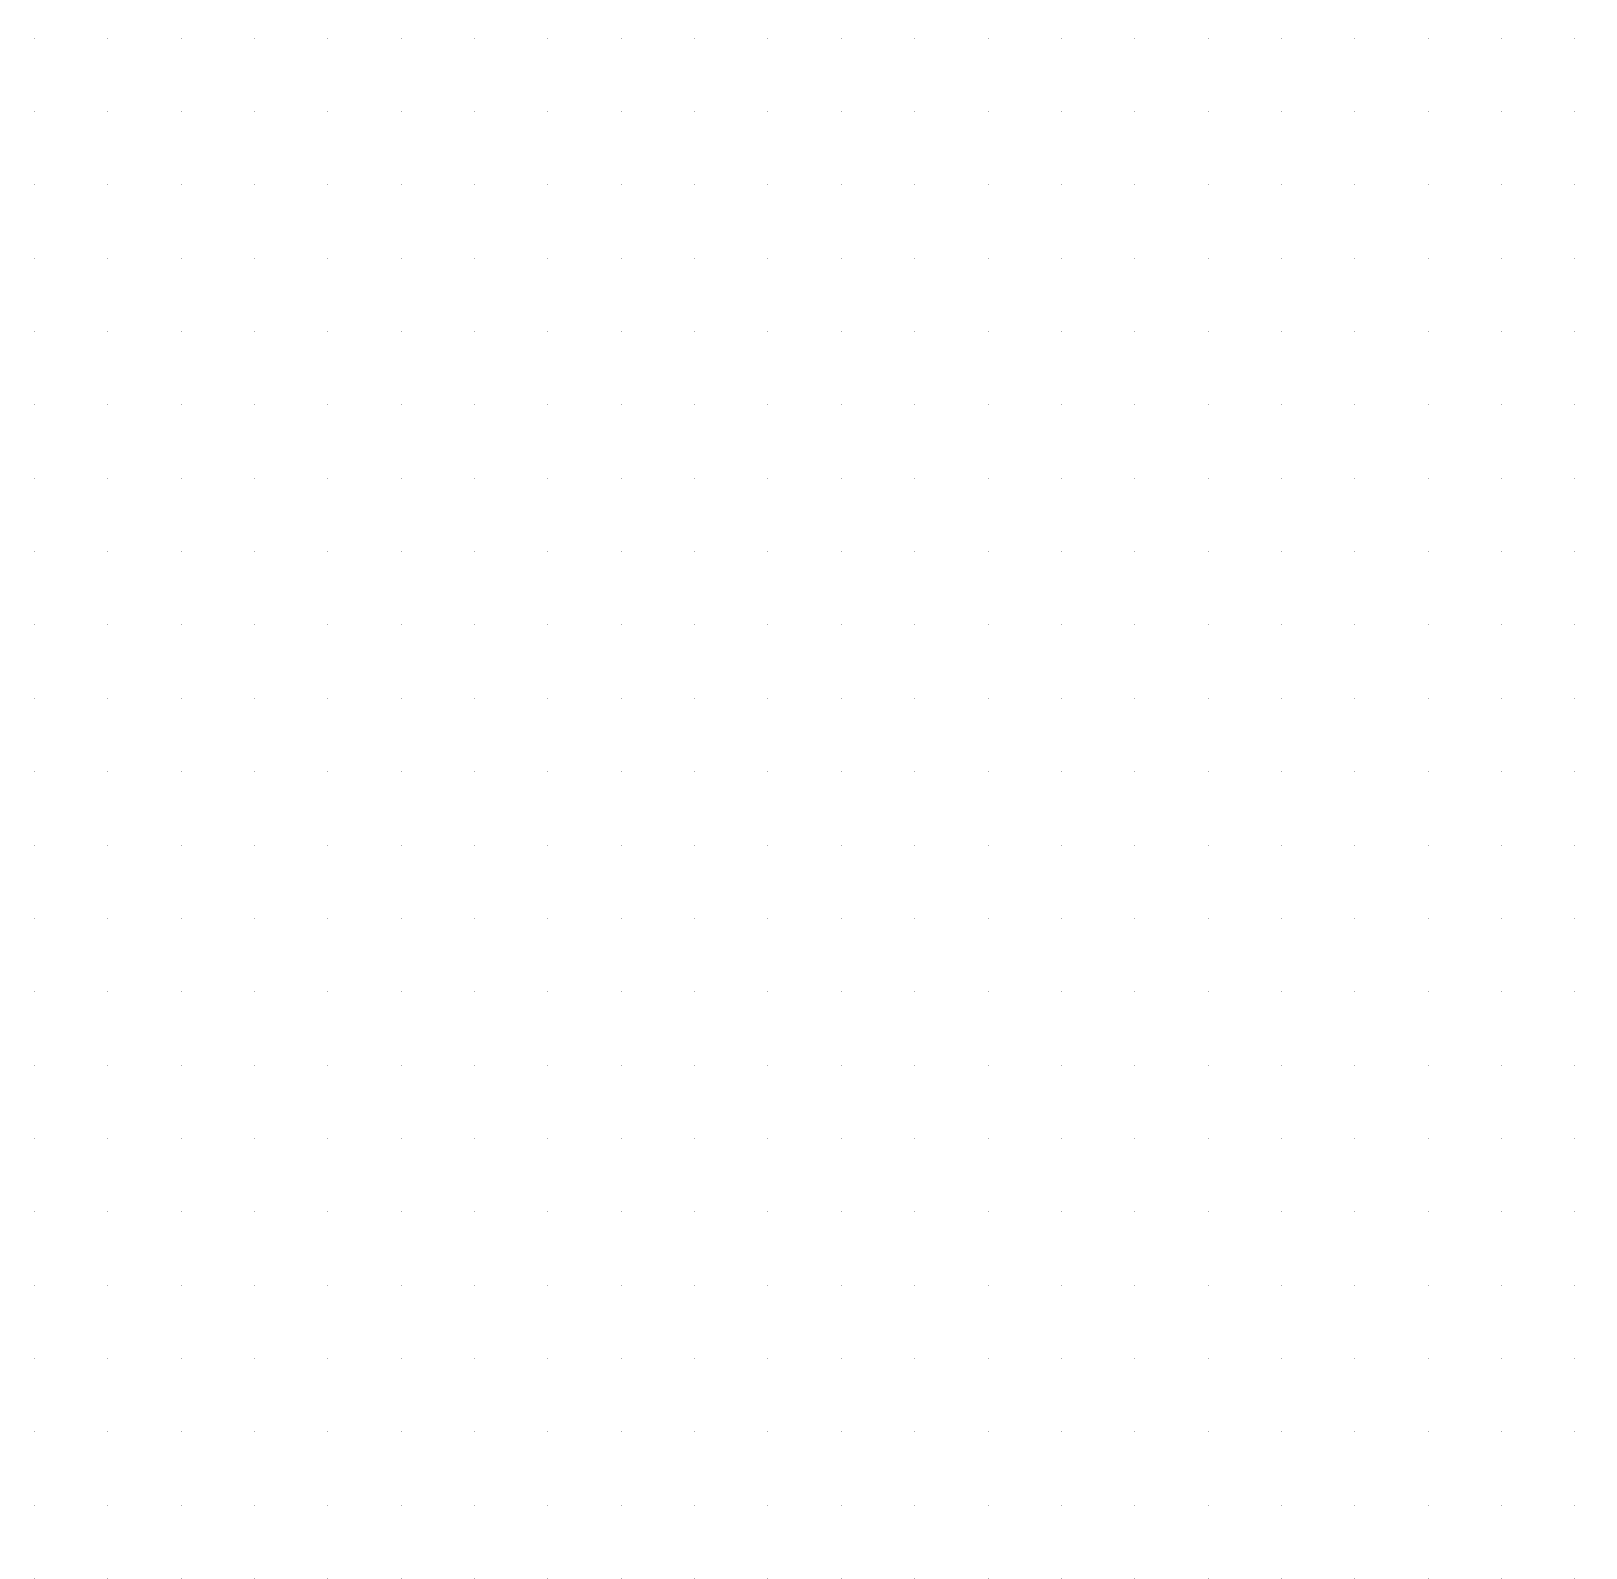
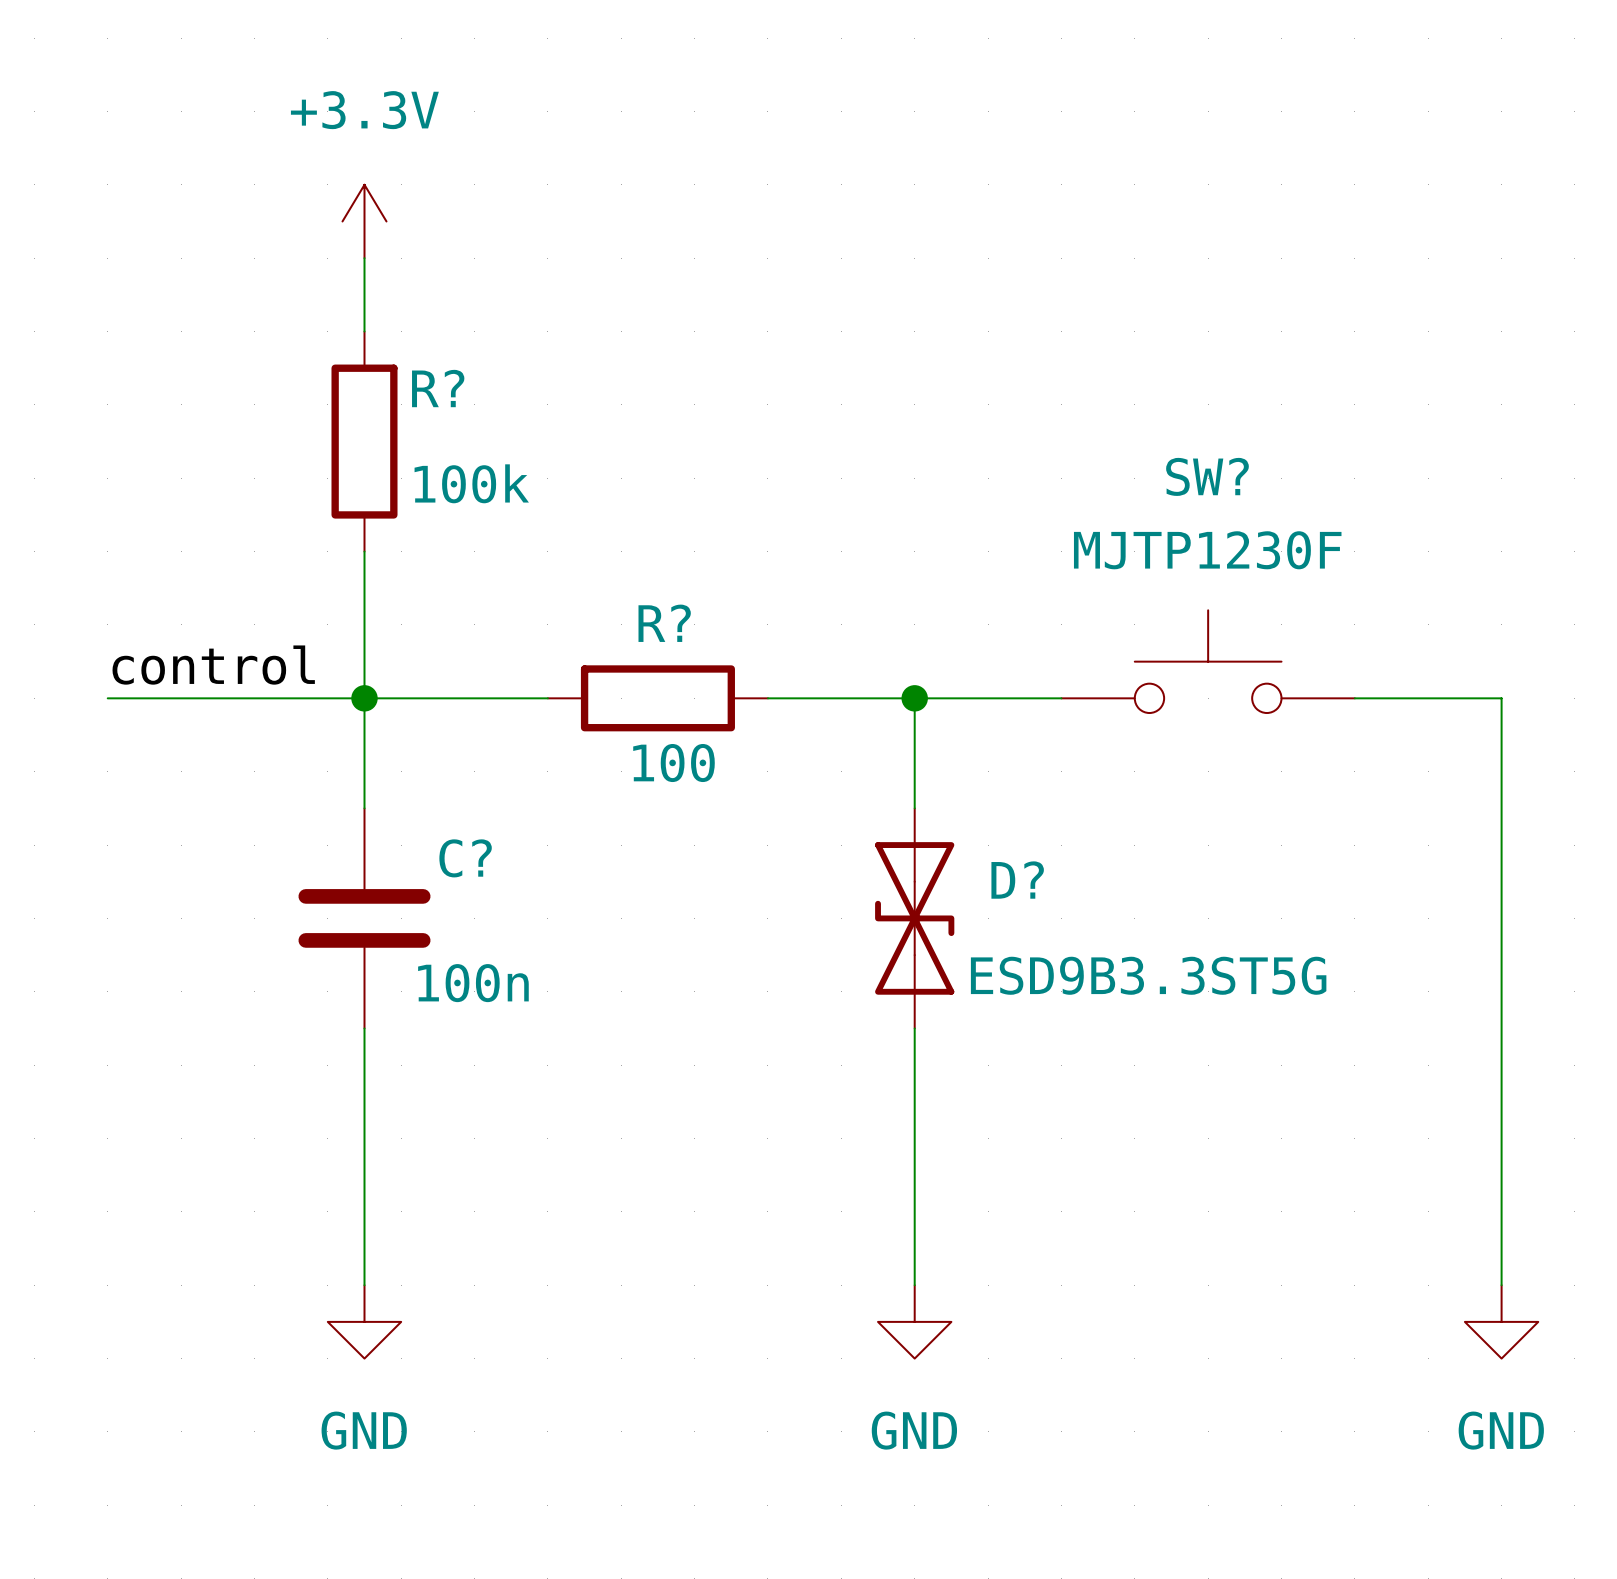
power symbol: none -> +3.3V (364, 221)
wire: none -> (364, 258) (364, 331)
R?: none -> 100k (364, 441)
wire: none -> (364, 551) (364, 808)
SW?: none -> MJTP1230F (1208, 661)
label: none -> control (213, 665)
wire: none -> (107, 698) (547, 698)
junction: none -> (364, 698)
R?: none -> 100 (657, 698)
wire: none -> (767, 698) (1061, 698)
wire: none -> (914, 698) (914, 808)
junction: none -> (914, 698)
wire: none -> (1354, 698) (1501, 698) (1501, 1285)
C?: none -> 100n (364, 918)
D?: none -> ESD9B3.3ST5G (914, 918)
wire: none -> (364, 1028) (364, 1285)
wire: none -> (914, 1028) (914, 1285)
power symbol: none -> GND (364, 1321)
power symbol: none -> GND (914, 1321)
power symbol: none -> GND (1501, 1321)

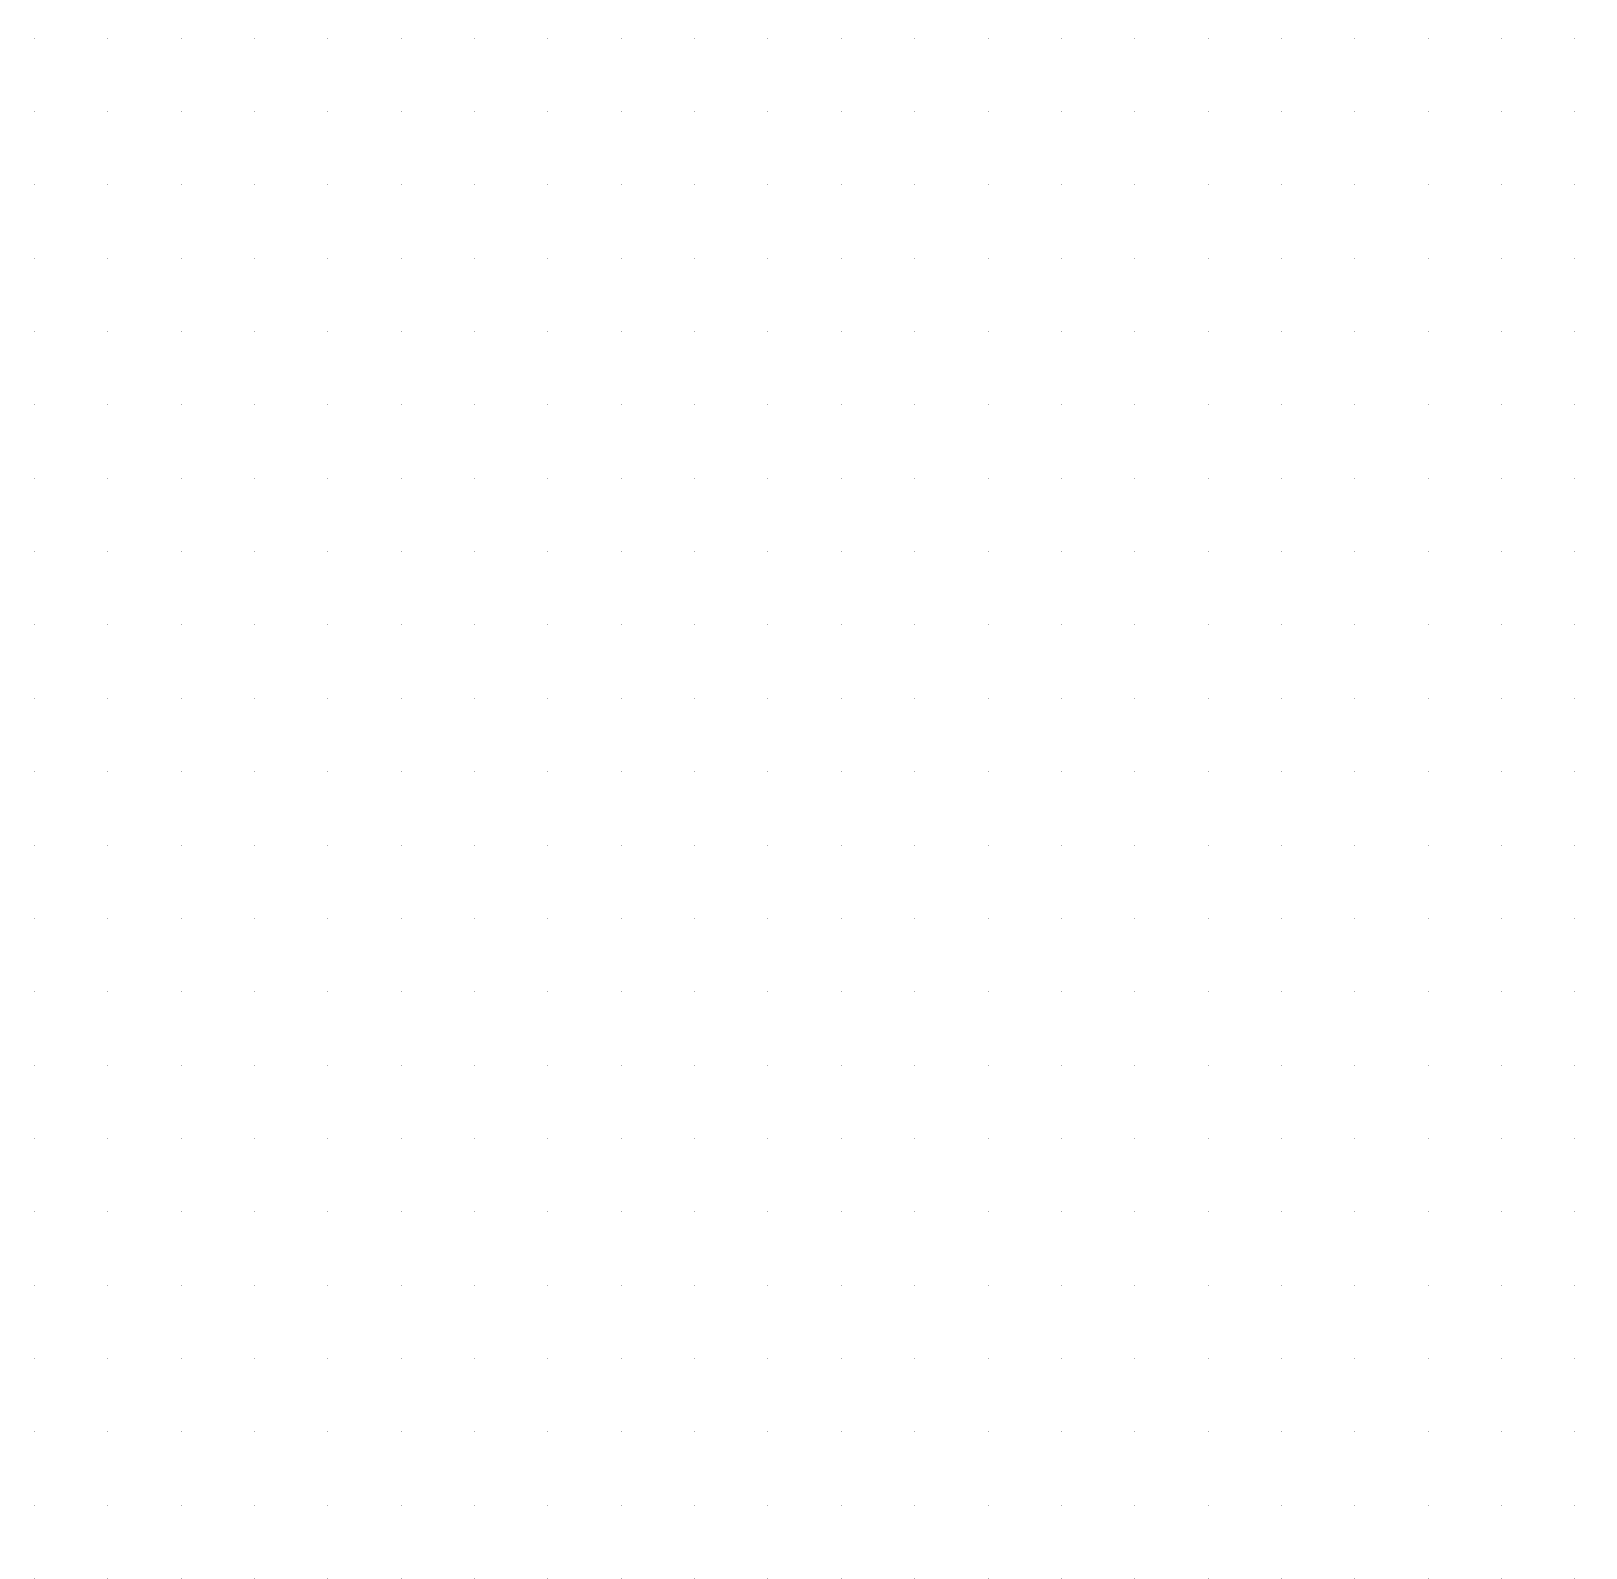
power symbol: +3.3V (364, 221) -> none
wire: (364, 258) (364, 331) -> none
R?: 100k (364, 441) -> none
wire: (364, 551) (364, 808) -> none
SW?: MJTP1230F (1208, 661) -> none
label: control (213, 665) -> none
wire: (107, 698) (547, 698) -> none
junction: (364, 698) -> none
R?: 100 (657, 698) -> none
wire: (767, 698) (1061, 698) -> none
wire: (914, 698) (914, 808) -> none
junction: (914, 698) -> none
wire: (1354, 698) (1501, 698) (1501, 1285) -> none
C?: 100n (364, 918) -> none
D?: ESD9B3.3ST5G (914, 918) -> none
wire: (364, 1028) (364, 1285) -> none
wire: (914, 1028) (914, 1285) -> none
power symbol: GND (364, 1321) -> none
power symbol: GND (914, 1321) -> none
power symbol: GND (1501, 1321) -> none

